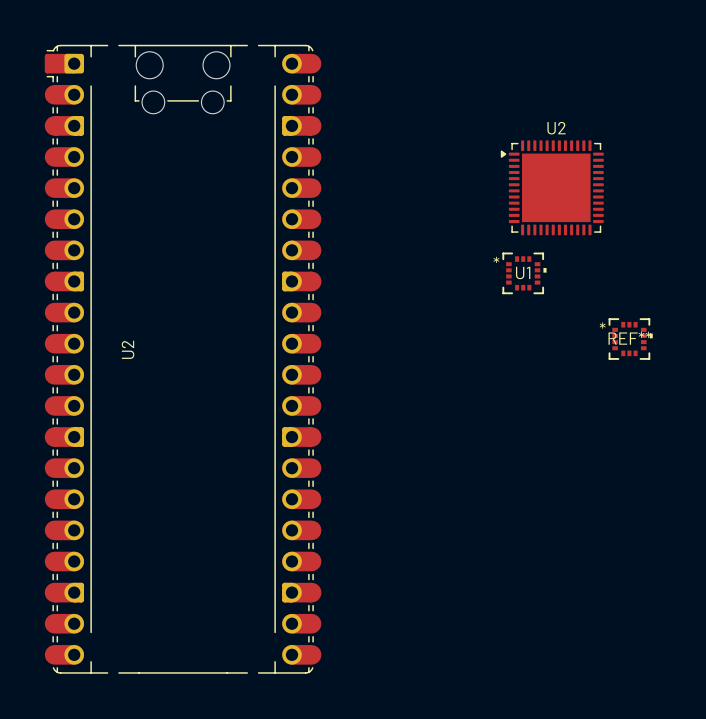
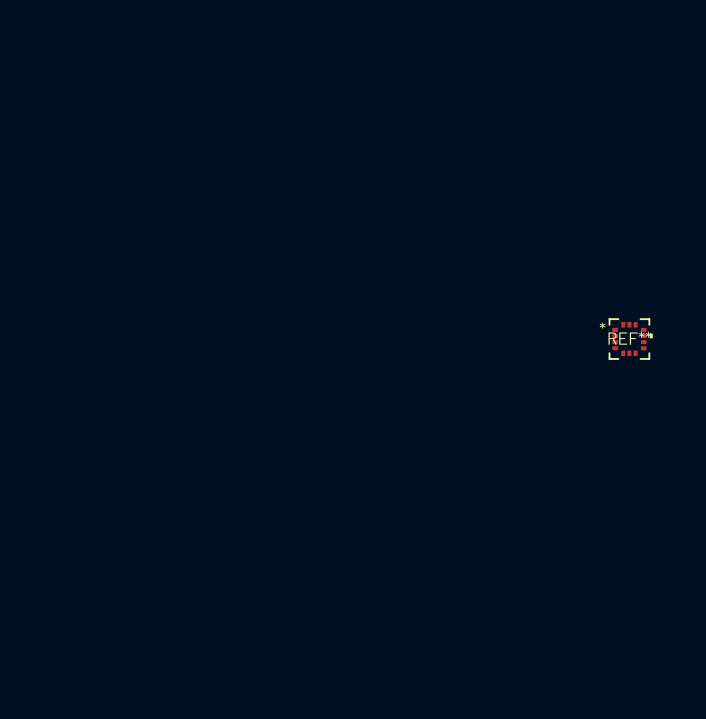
U2: (552, 187) -> none
U1: (524, 273) -> none
U2: (183, 359) -> none

